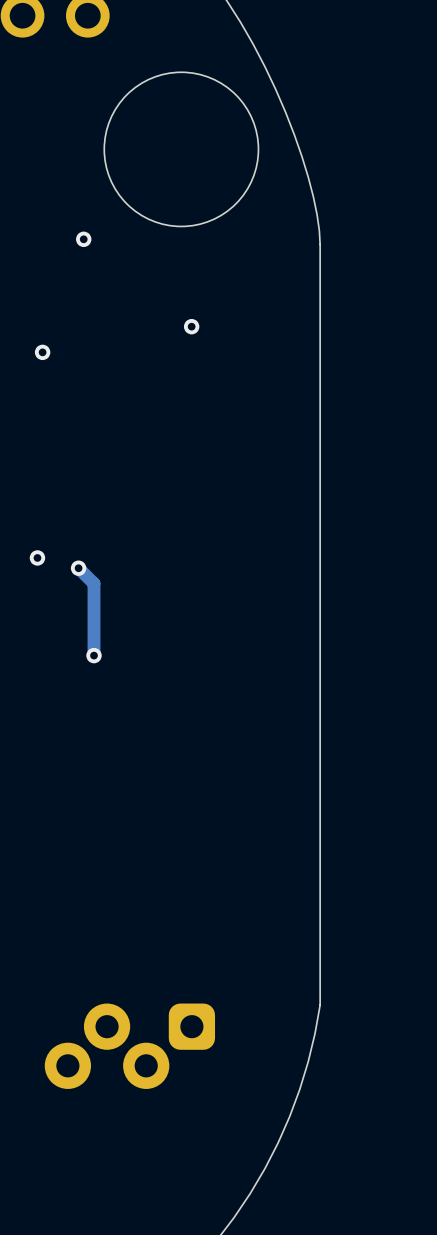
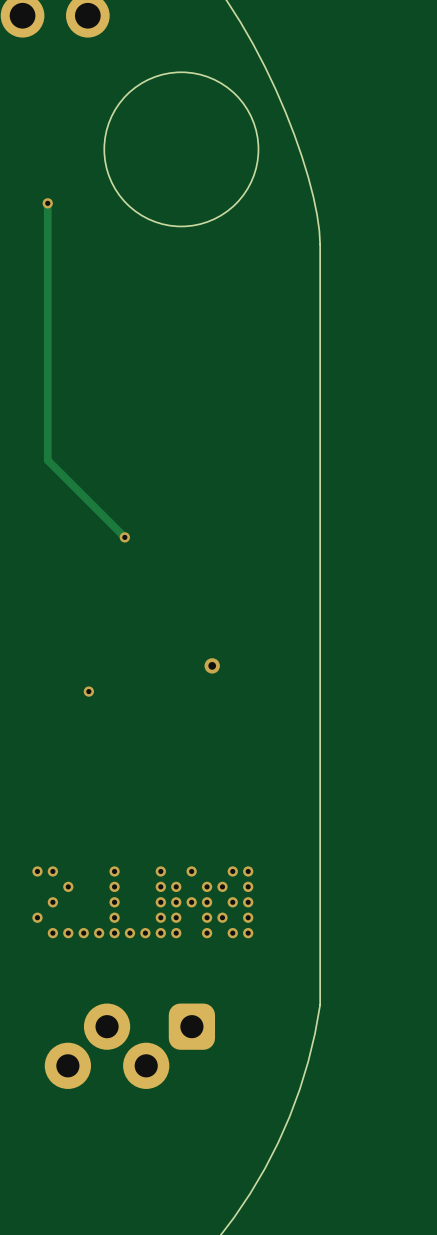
track: none -> (47, 203) (47, 460) (124, 537)
via: none -> (47, 203)
via: (83, 239) -> none
via: (191, 326) -> none
via: (42, 352) -> none
via: none -> (124, 537)
via: (37, 557) -> none
track: (78, 568) (94, 583) (94, 655) -> none
via: (78, 568) -> none
via: (94, 655) -> none
via: none -> (212, 665)
via: none -> (88, 691)
via: none -> (37, 871)
via: none -> (52, 871)
via: none -> (114, 871)
via: none -> (160, 871)
via: none -> (191, 871)
via: none -> (232, 871)
via: none -> (248, 871)
via: none -> (68, 886)
via: none -> (114, 886)
via: none -> (160, 886)
via: none -> (176, 886)
via: none -> (207, 886)
via: none -> (222, 886)
via: none -> (248, 886)
via: none -> (52, 902)
via: none -> (114, 902)
via: none -> (160, 902)
via: none -> (176, 902)
via: none -> (191, 902)
via: none -> (207, 902)
via: none -> (232, 902)
via: none -> (248, 902)
via: none -> (37, 917)
via: none -> (114, 917)
via: none -> (160, 917)
via: none -> (176, 917)
via: none -> (207, 917)
via: none -> (222, 917)
via: none -> (248, 917)
via: none -> (52, 933)
via: none -> (68, 933)
via: none -> (83, 933)
via: none -> (99, 933)
via: none -> (114, 933)
via: none -> (129, 933)
via: none -> (145, 933)
via: none -> (160, 933)
via: none -> (176, 933)
via: none -> (207, 933)
via: none -> (232, 933)
via: none -> (248, 933)

